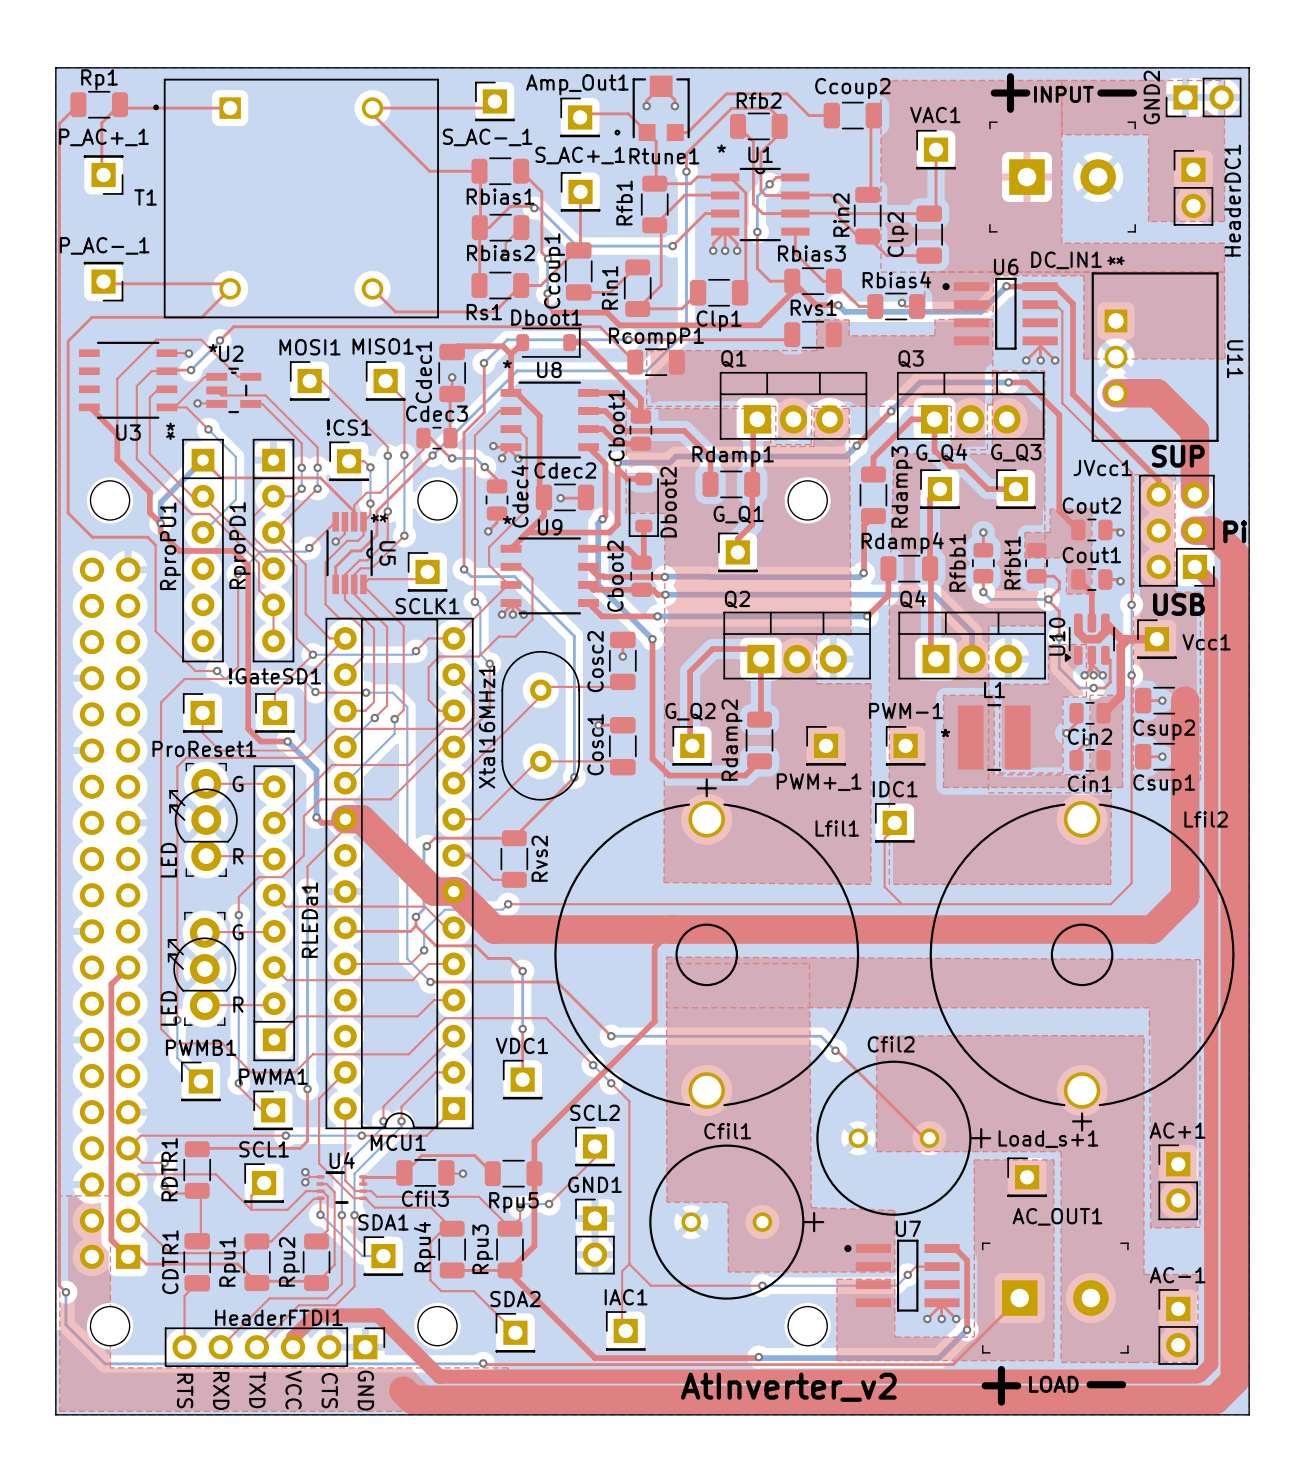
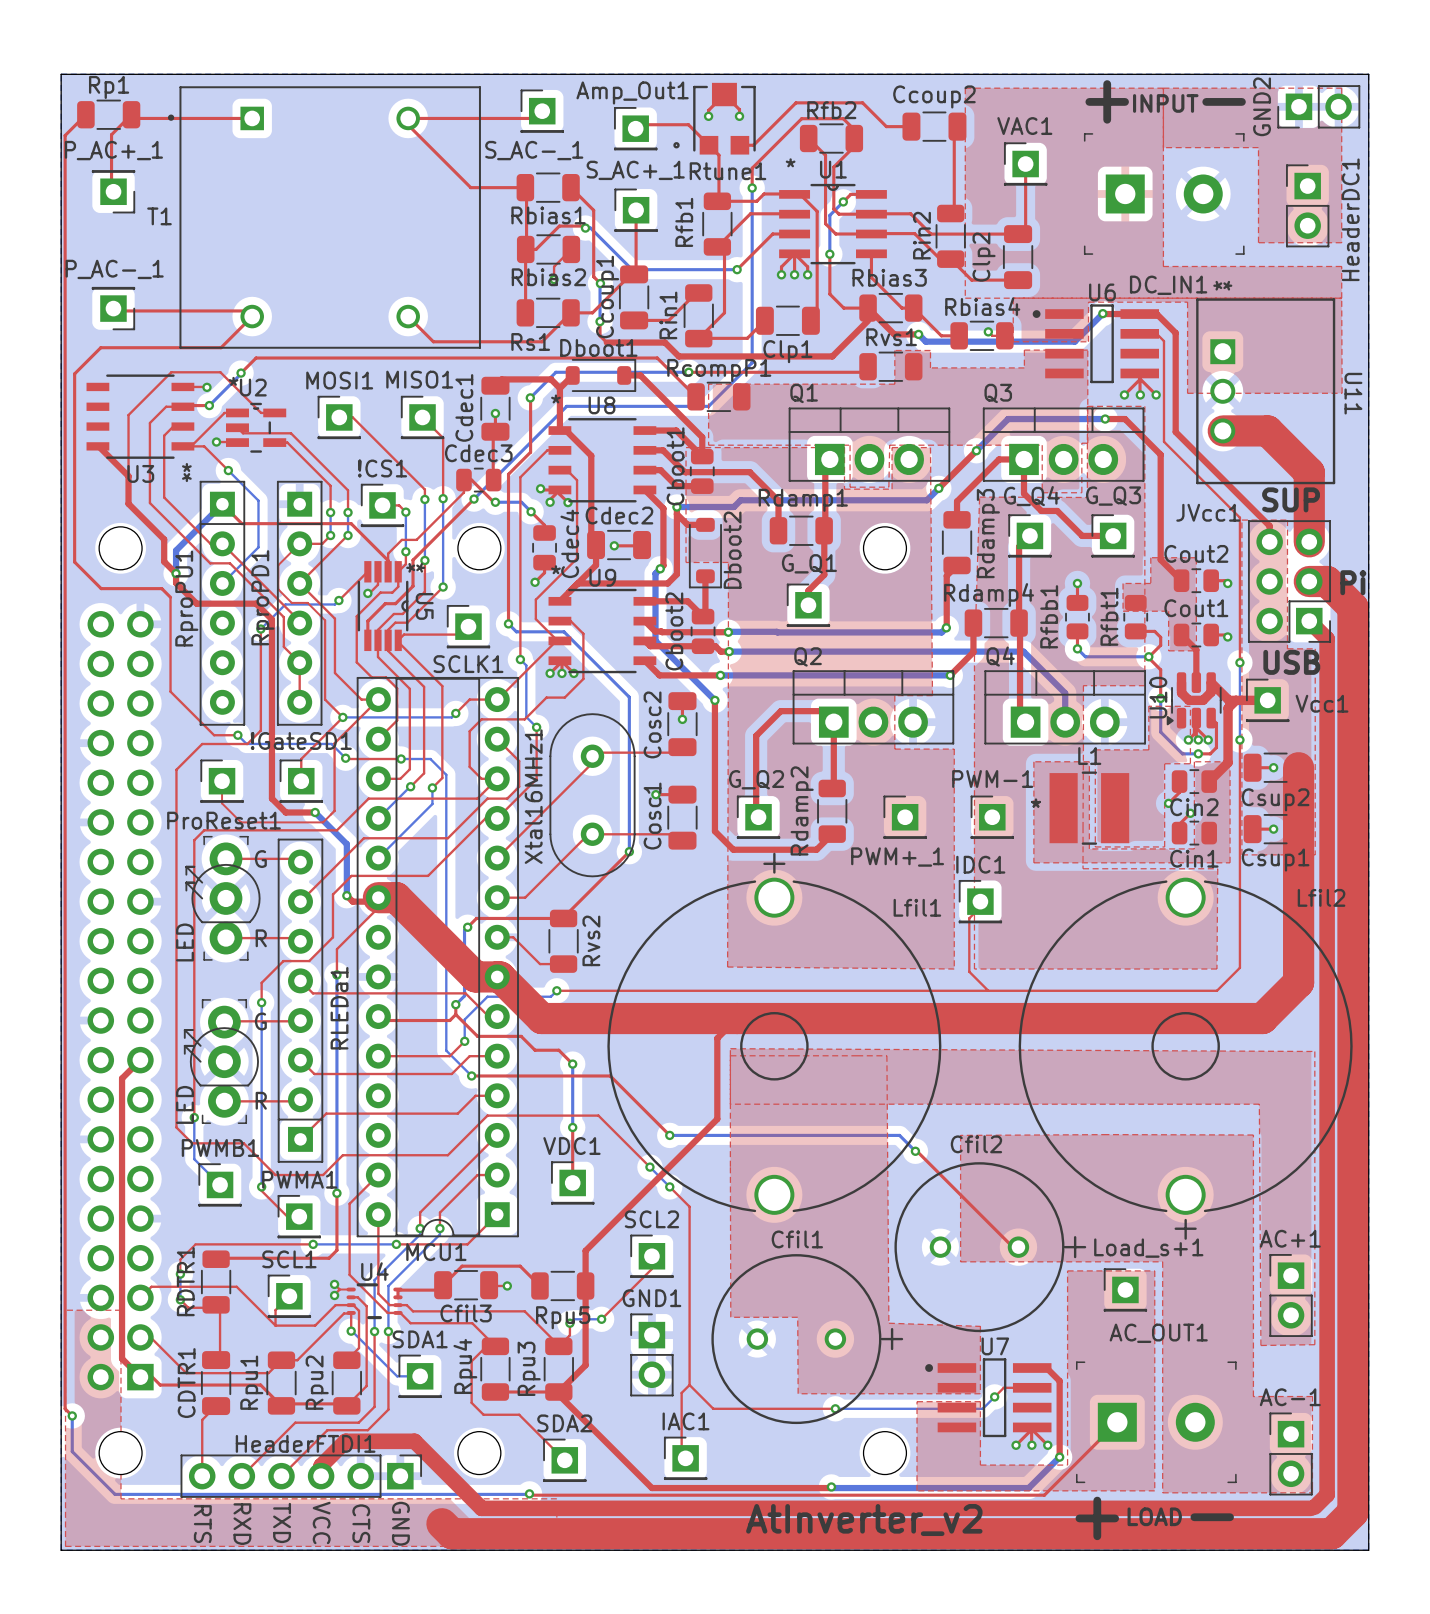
top track: (178, 1135) (140, 1135) (128, 1148) (142, 1162) (164, 1162) -> (195, 1244) (180, 1259) (180, 1274)

